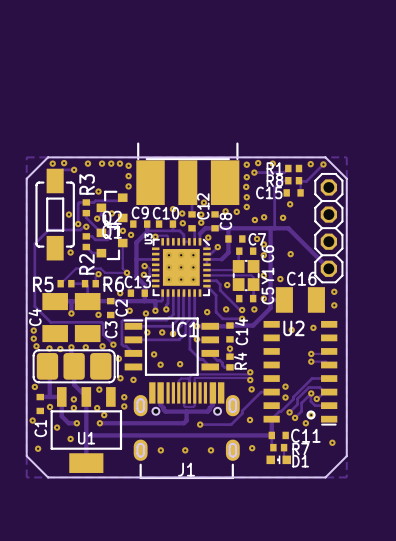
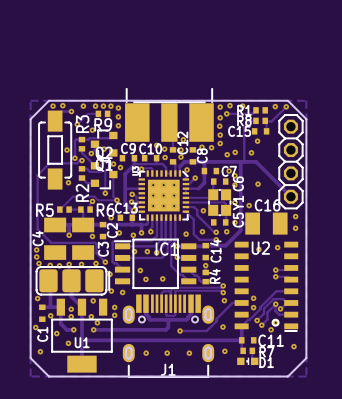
track: none -> (98, 113) (87, 113) (77, 124)
R9: none -> (103, 113)
via: none -> (77, 124)
track: none -> (113, 162) (105, 171) (105, 193)
via: none -> (105, 193)
via: none -> (133, 210)

